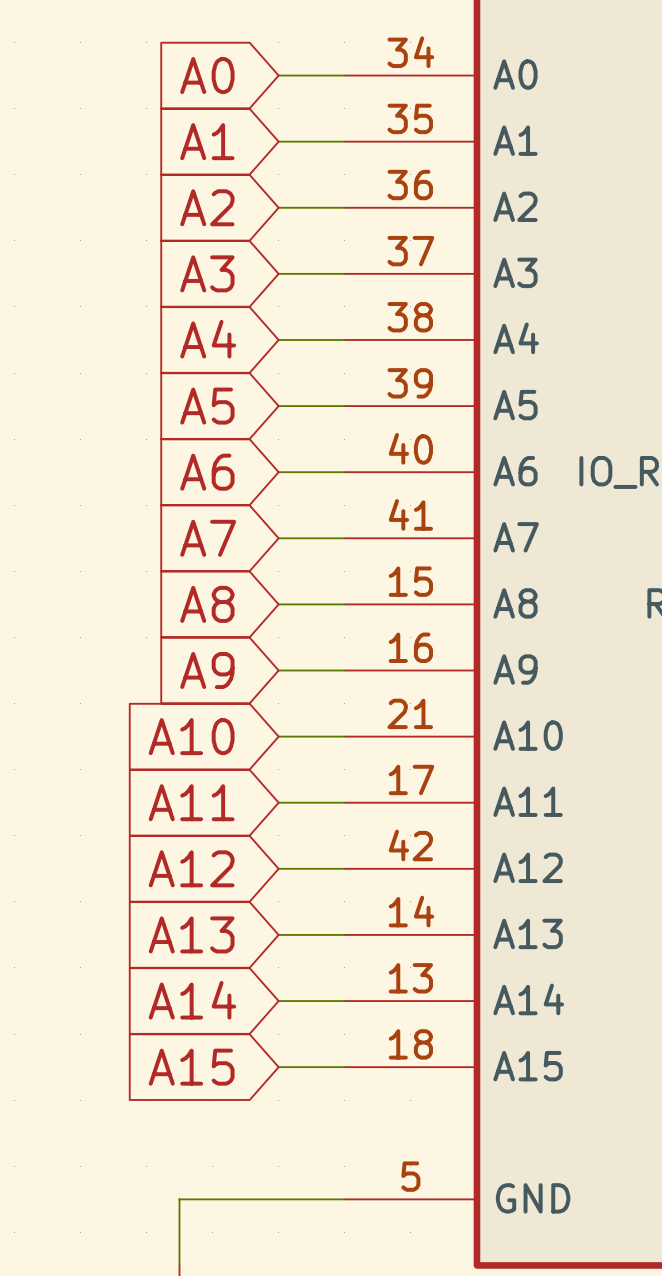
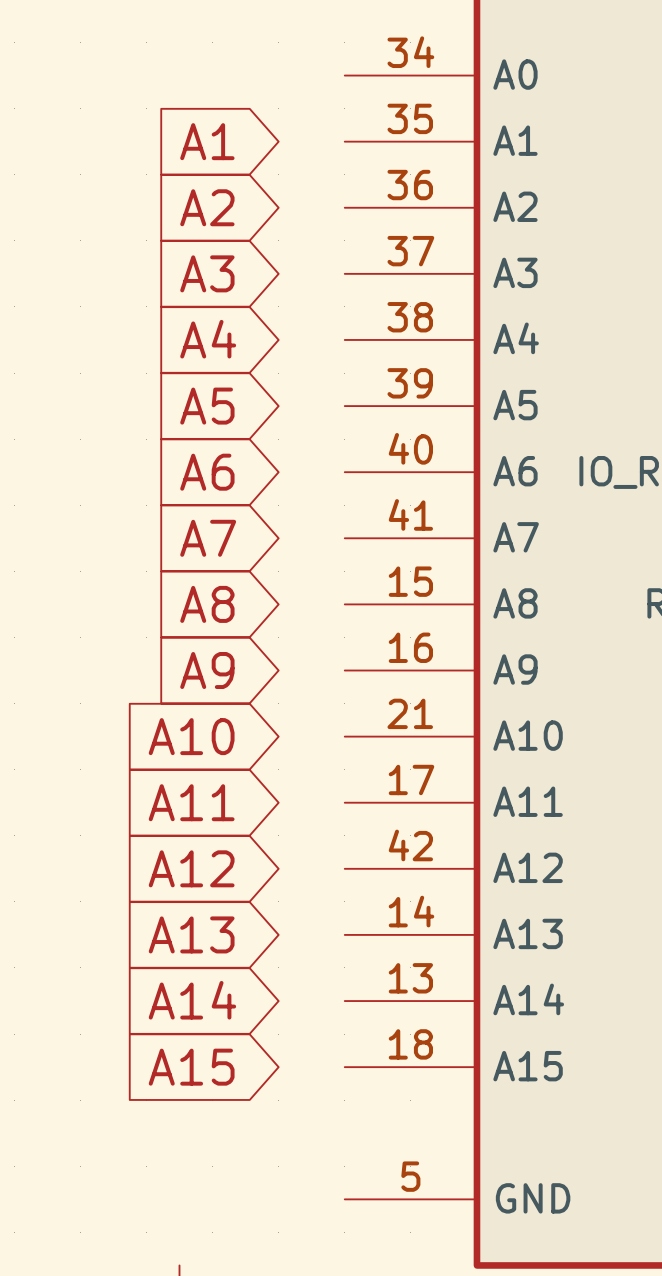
global label: A0 (207, 75) -> none
wire: (278, 75) (344, 75) -> none
wire: (278, 141) (344, 141) -> none
wire: (278, 207) (344, 207) -> none
wire: (278, 273) (344, 273) -> none
wire: (278, 339) (344, 339) -> none
wire: (278, 406) (344, 406) -> none
wire: (278, 472) (344, 472) -> none
wire: (278, 538) (344, 538) -> none
wire: (278, 604) (344, 604) -> none
wire: (278, 670) (344, 670) -> none
wire: (278, 736) (344, 736) -> none
wire: (278, 802) (344, 802) -> none
wire: (278, 868) (344, 868) -> none
wire: (278, 934) (344, 934) -> none
wire: (278, 1001) (344, 1001) -> none
wire: (278, 1067) (344, 1067) -> none
wire: (344, 1199) (179, 1199) (179, 1265) -> none

